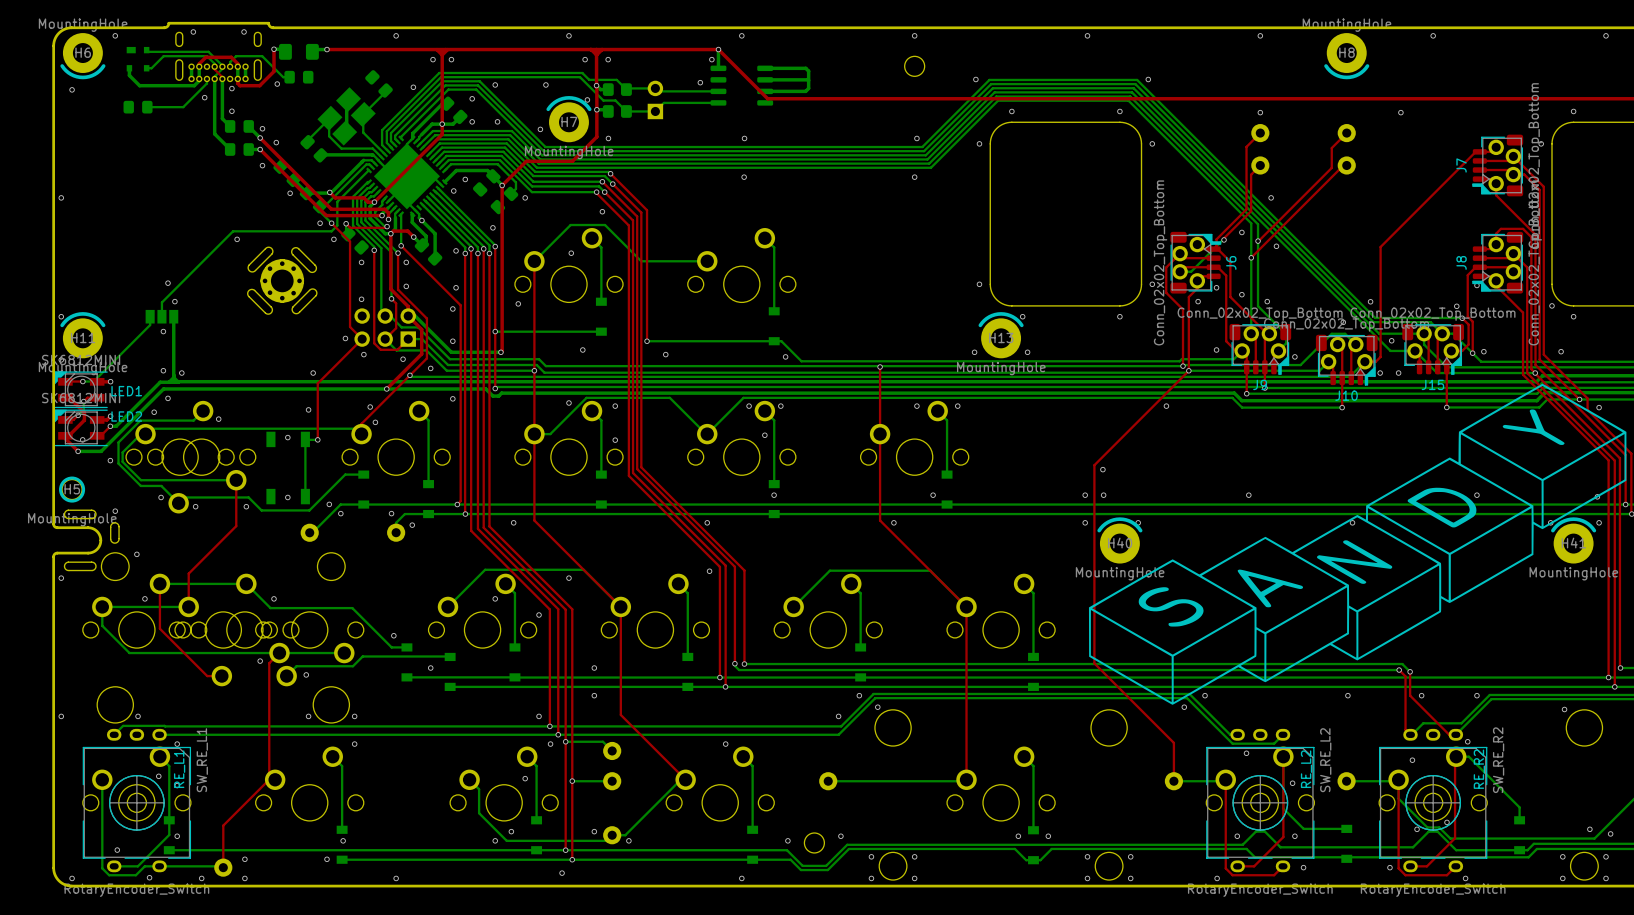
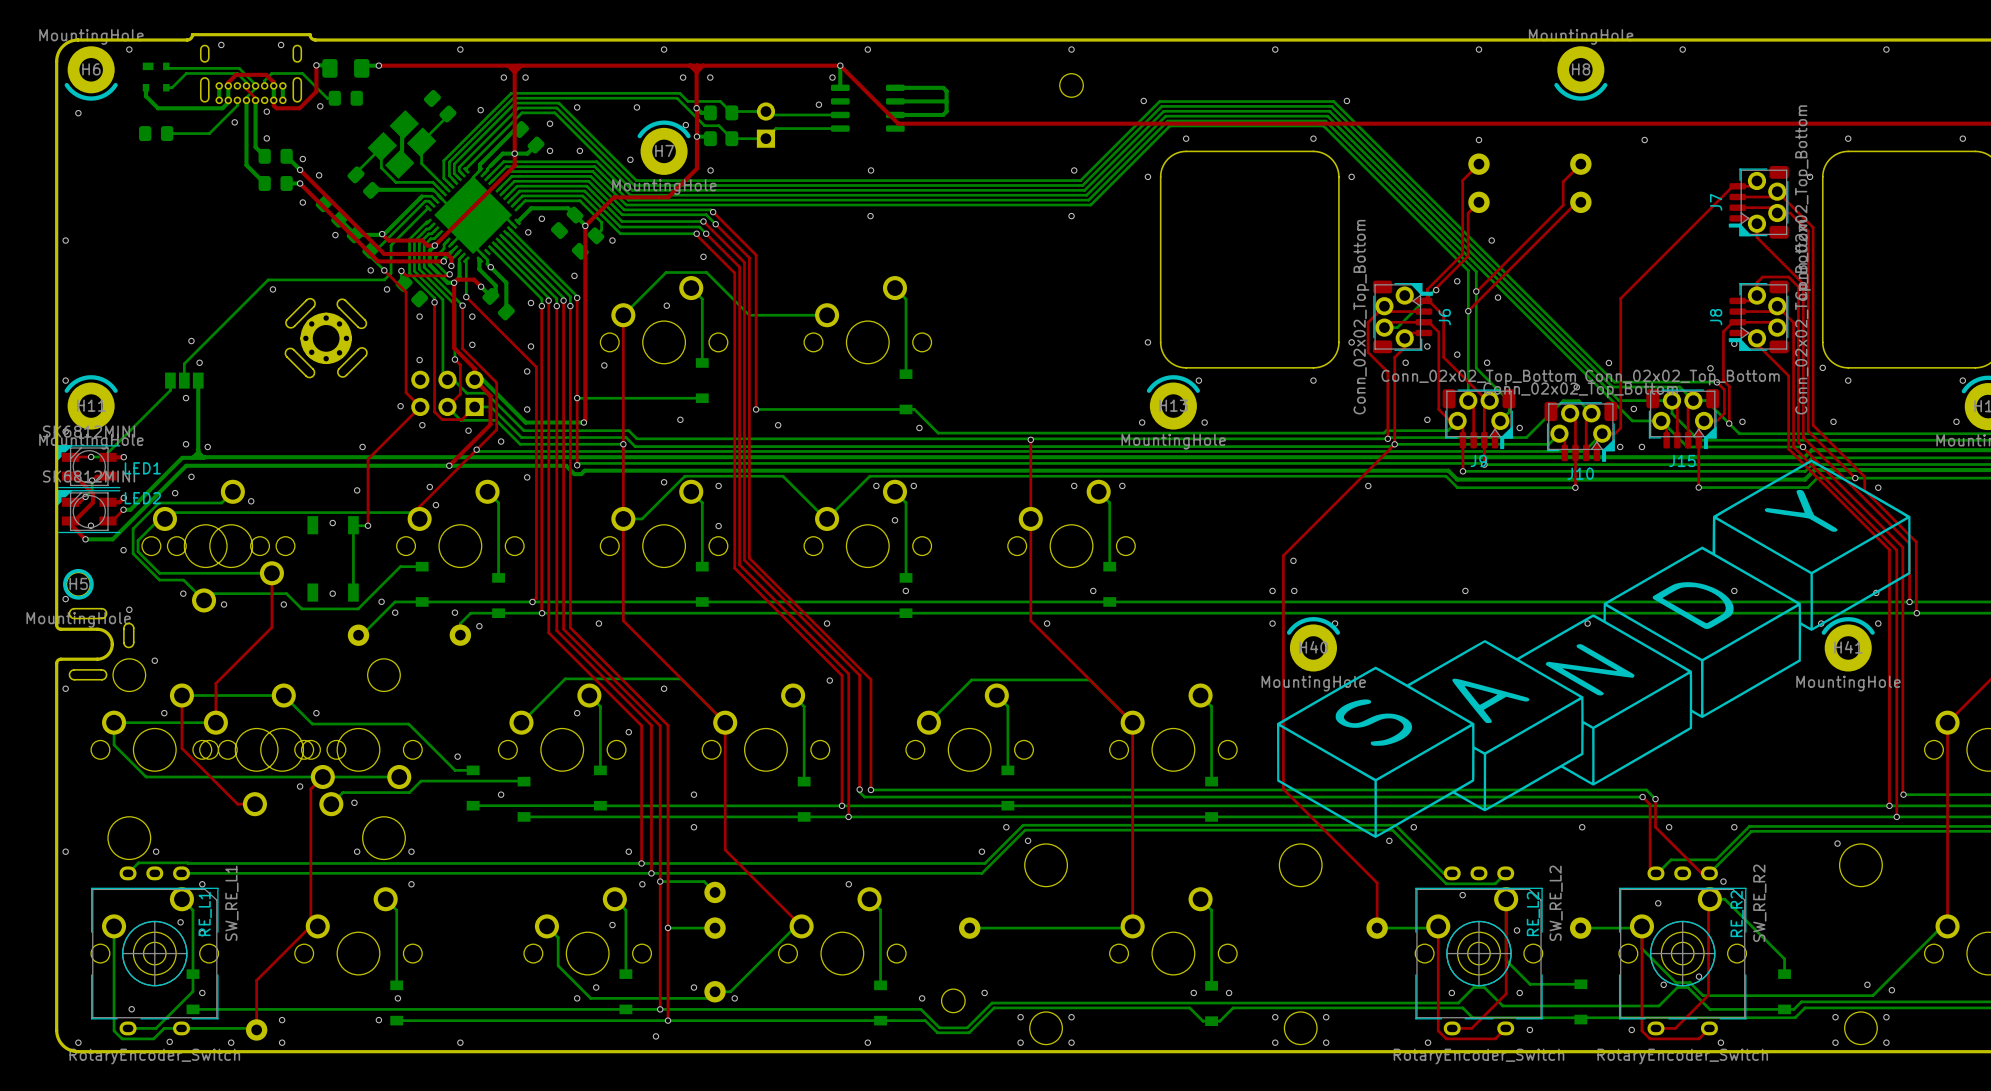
via: none -> (65, 599)

